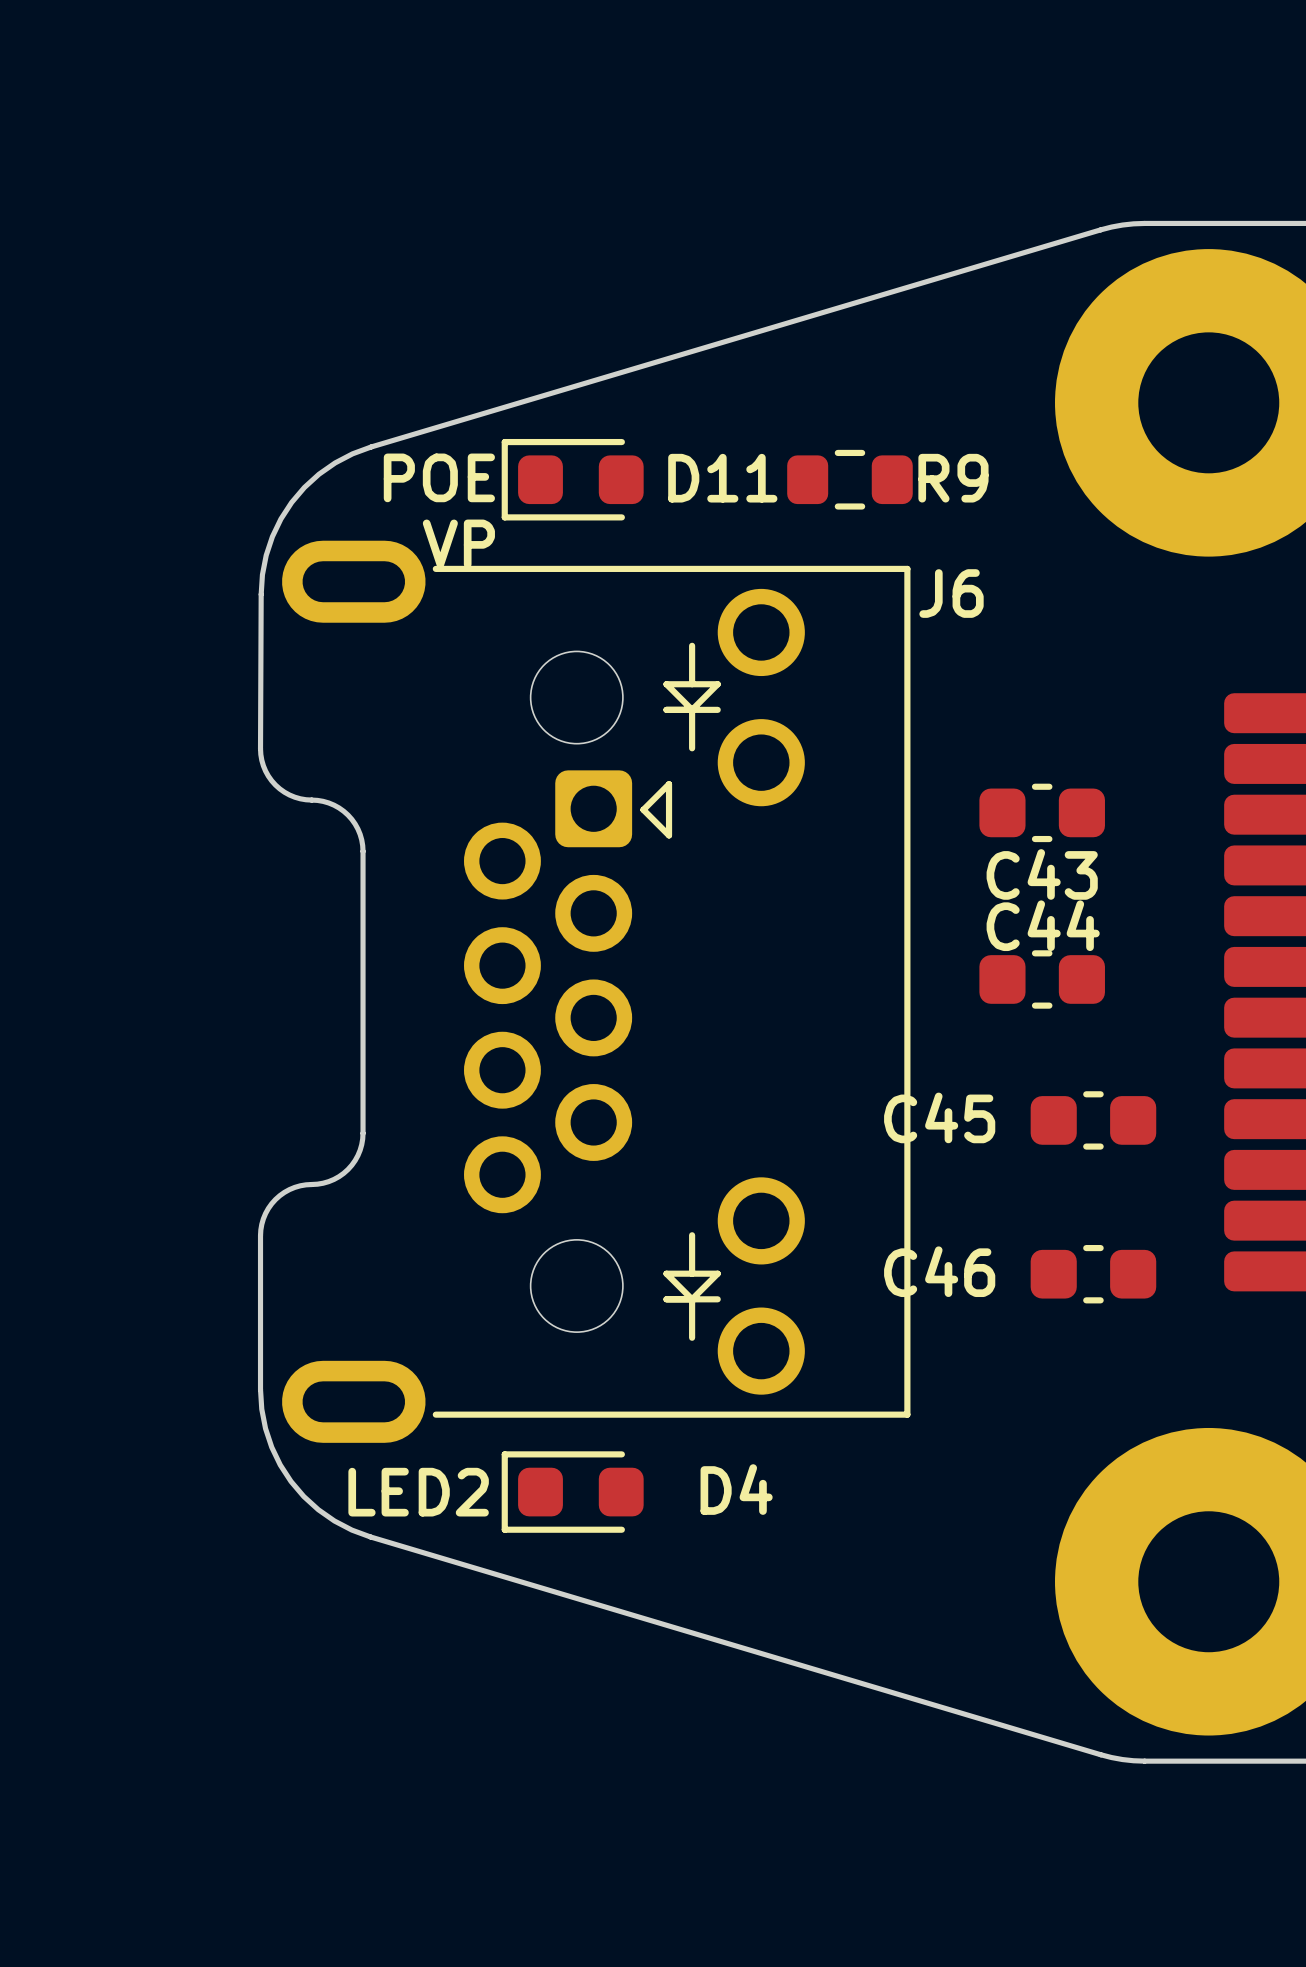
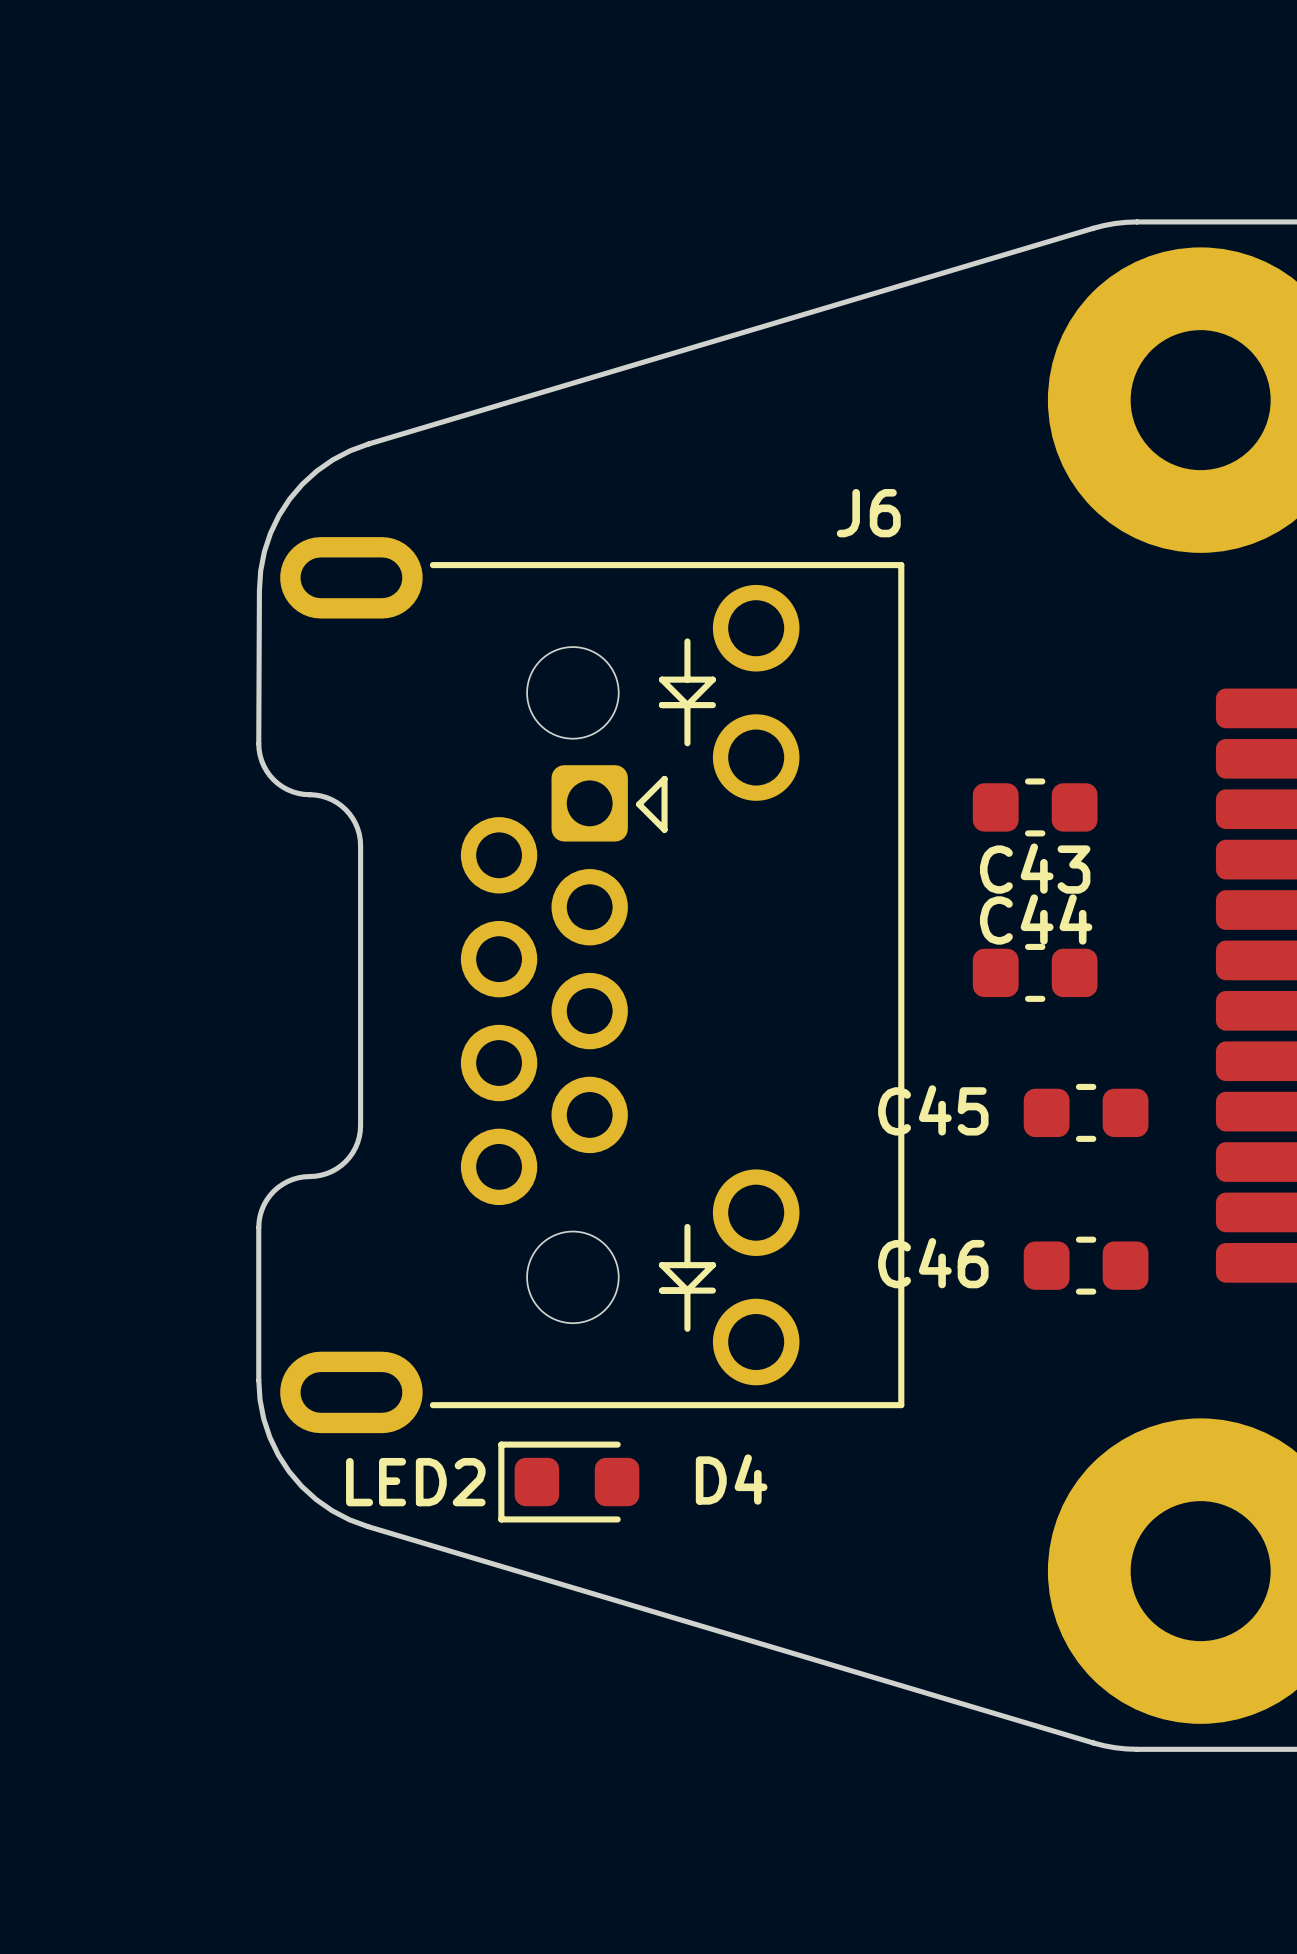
text: POE (439, 477) -> none
D11: (572, 479) -> none
R9: (849, 479) -> none
text: VP (458, 543) -> none
J6 name position: J6 (951, 593) -> J6 (868, 513)

